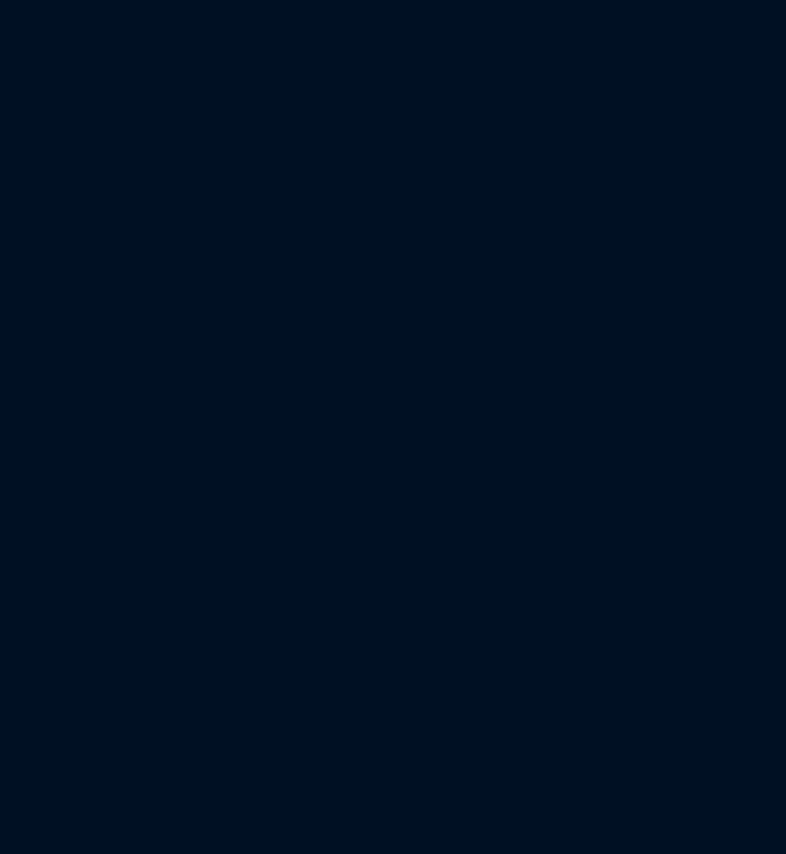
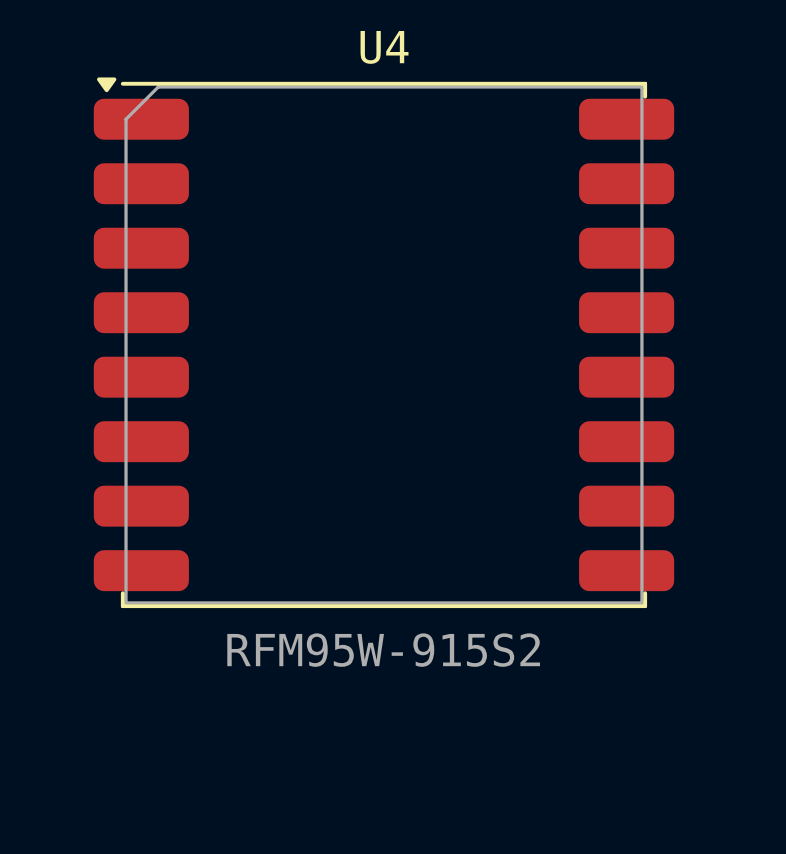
U4: none -> RFM95W-915S2 (383, 342)

